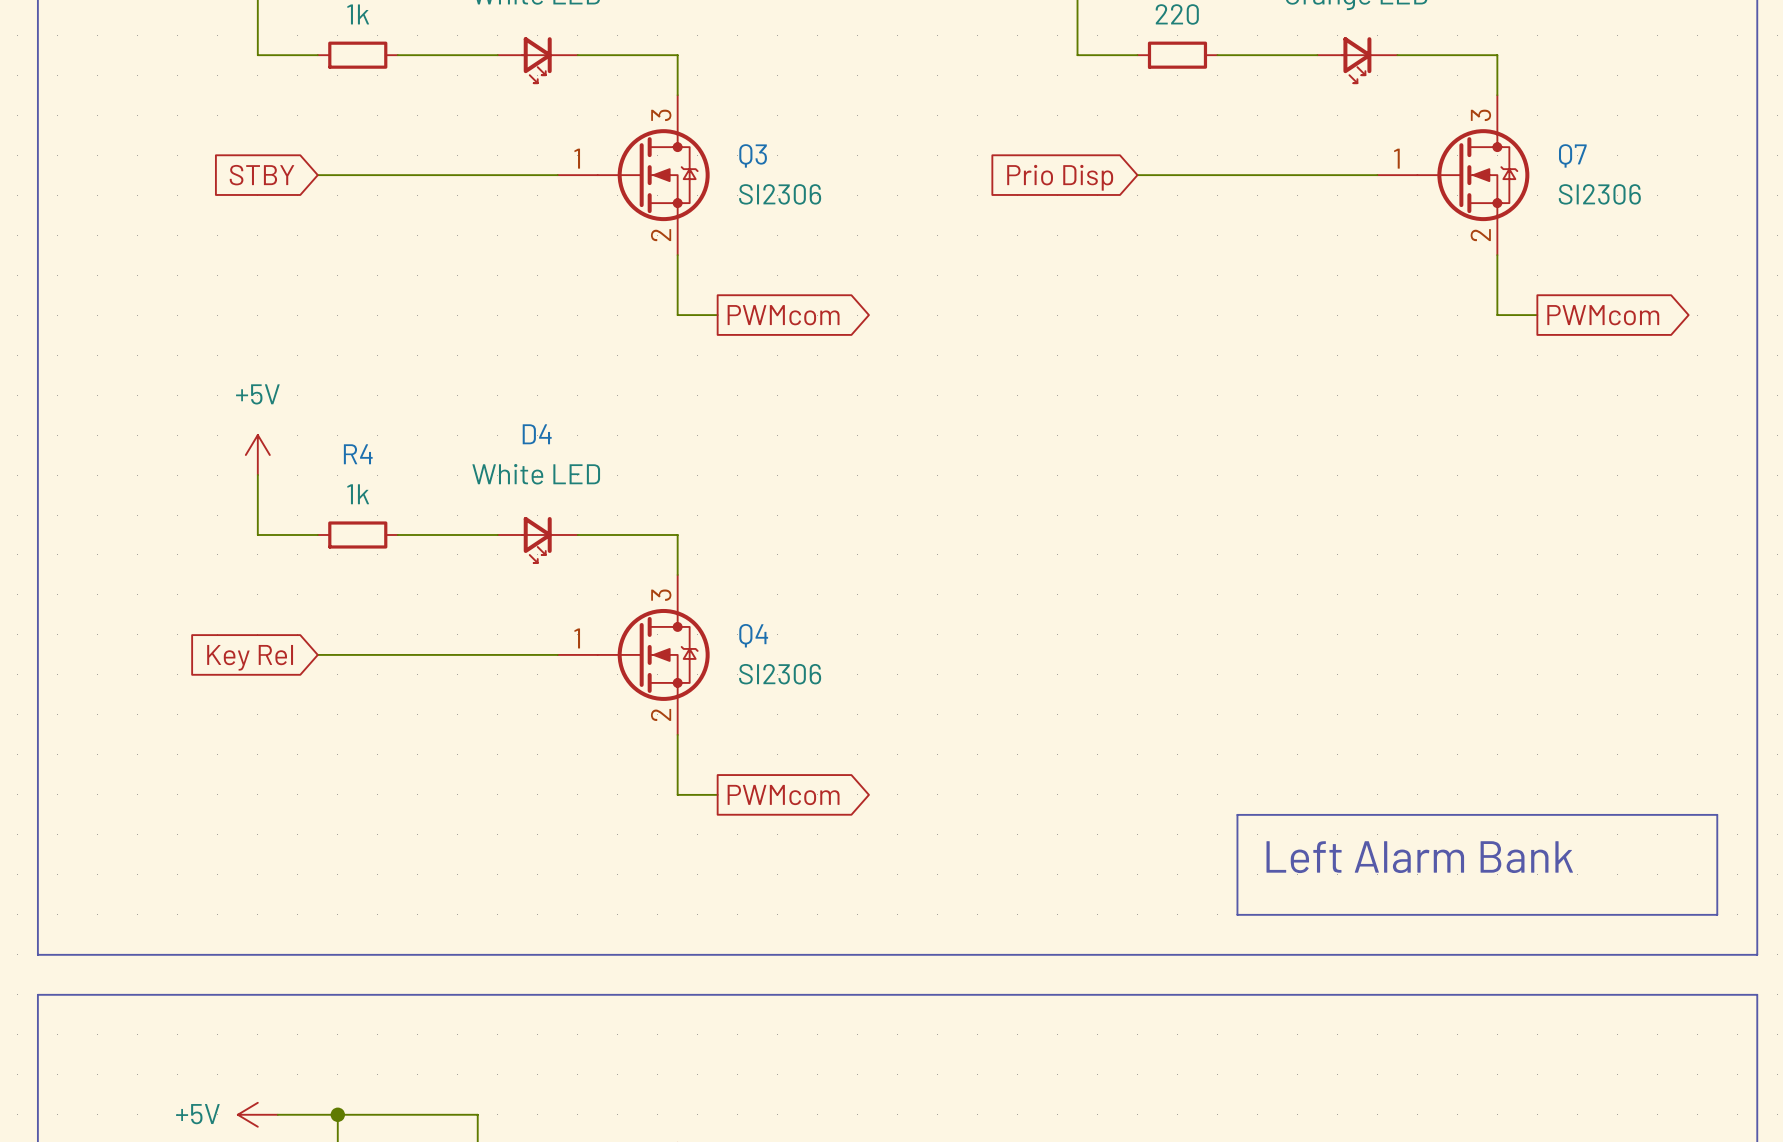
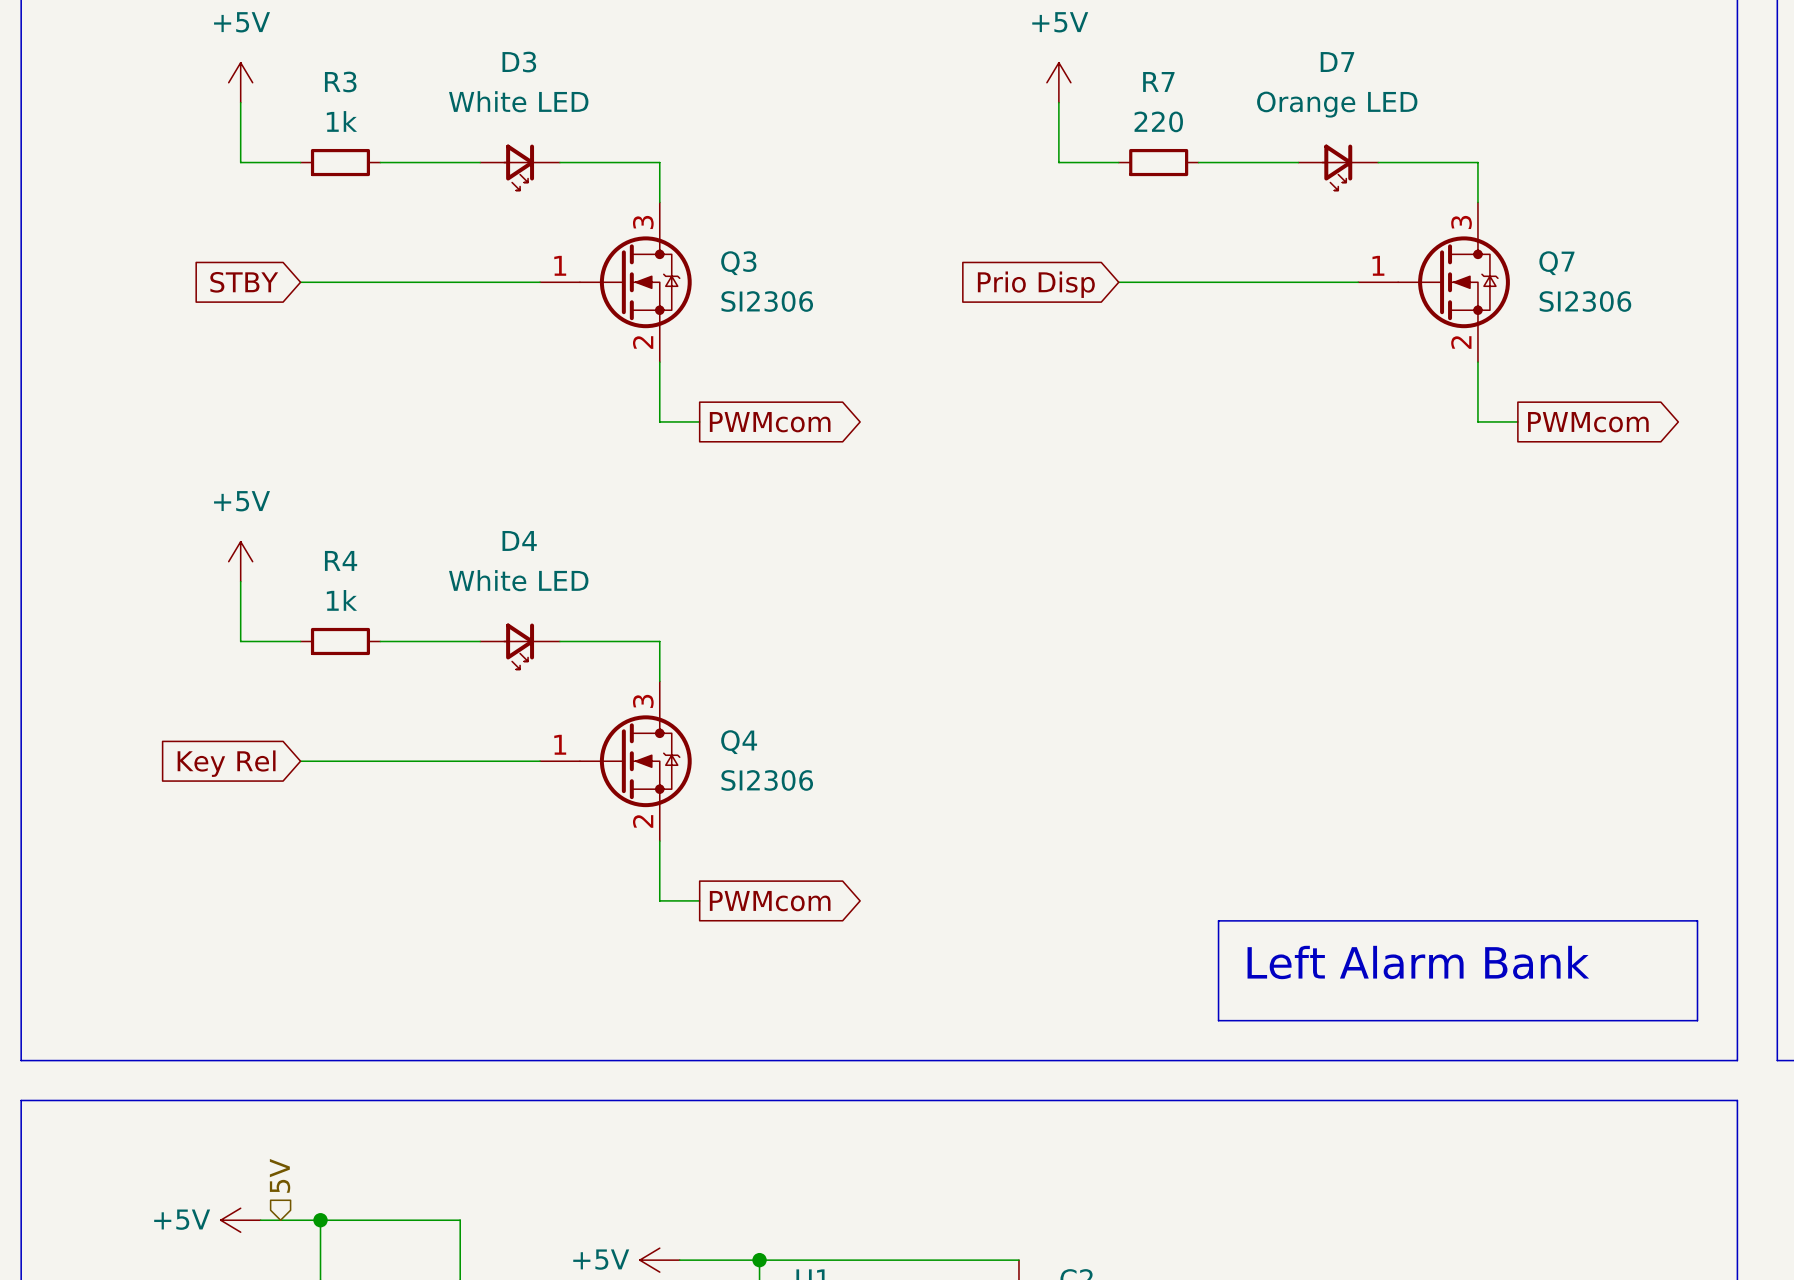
hierarchical label: none -> 5V (280, 1175)

